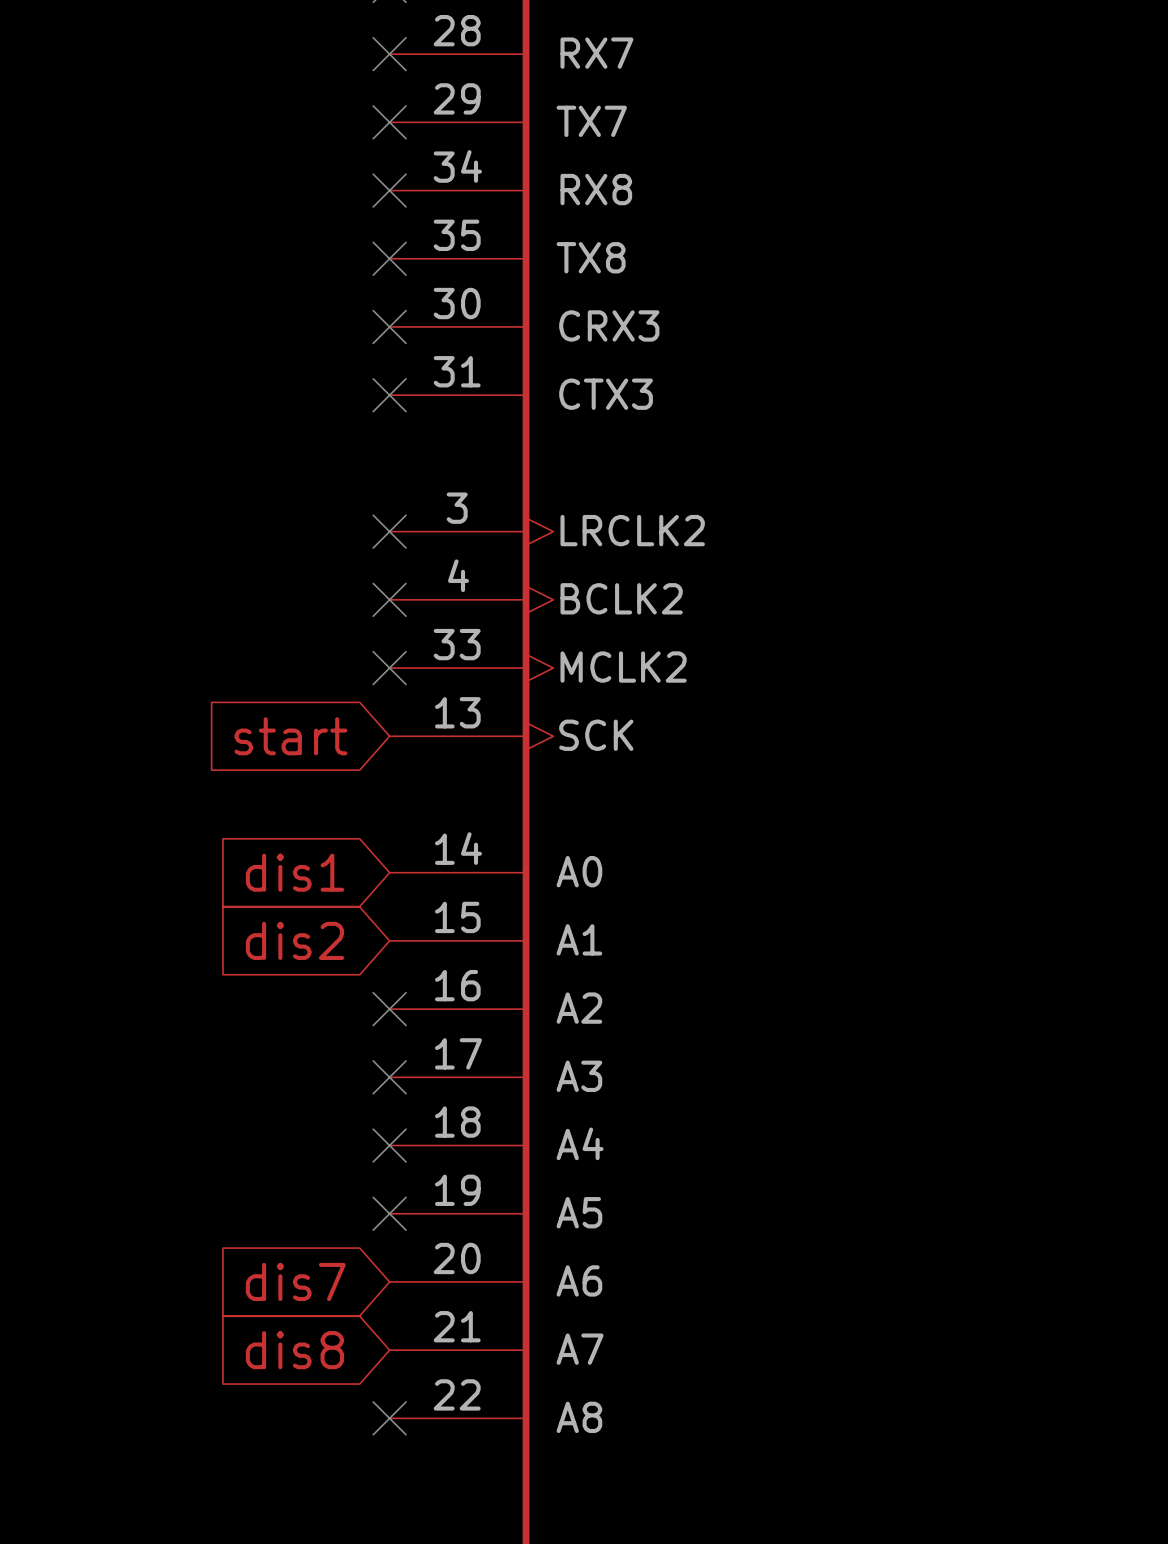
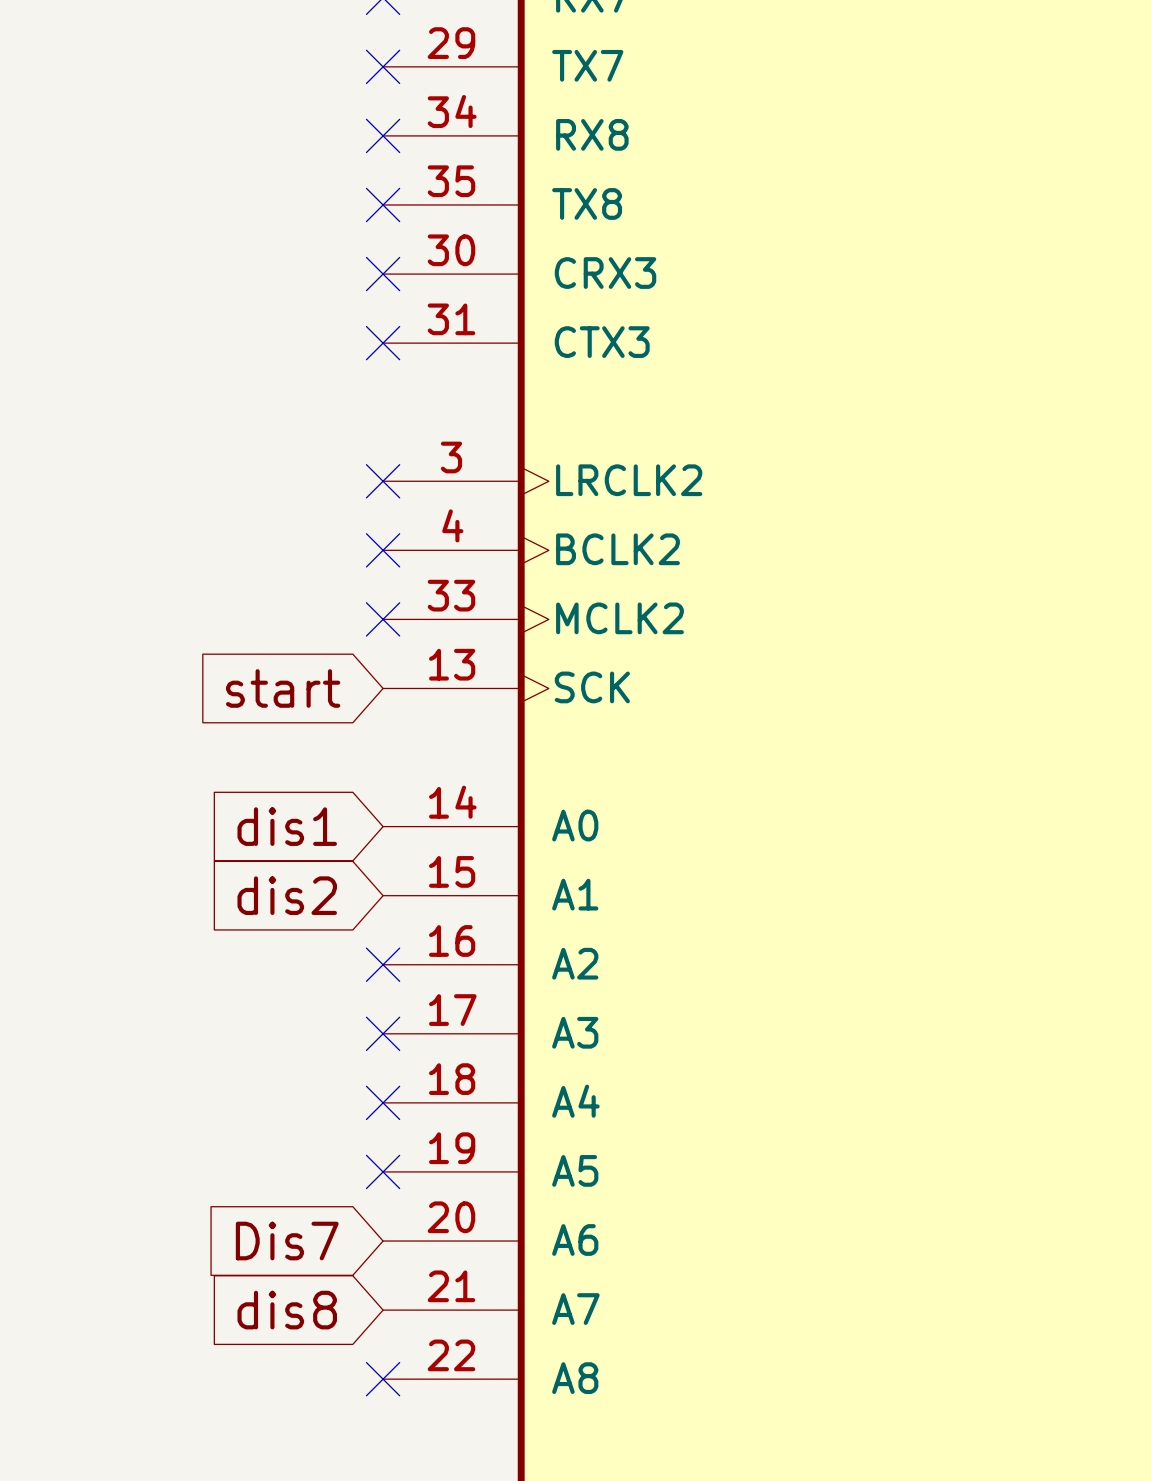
global label: dis7 (295, 1281) -> Dis7 (287, 1241)

